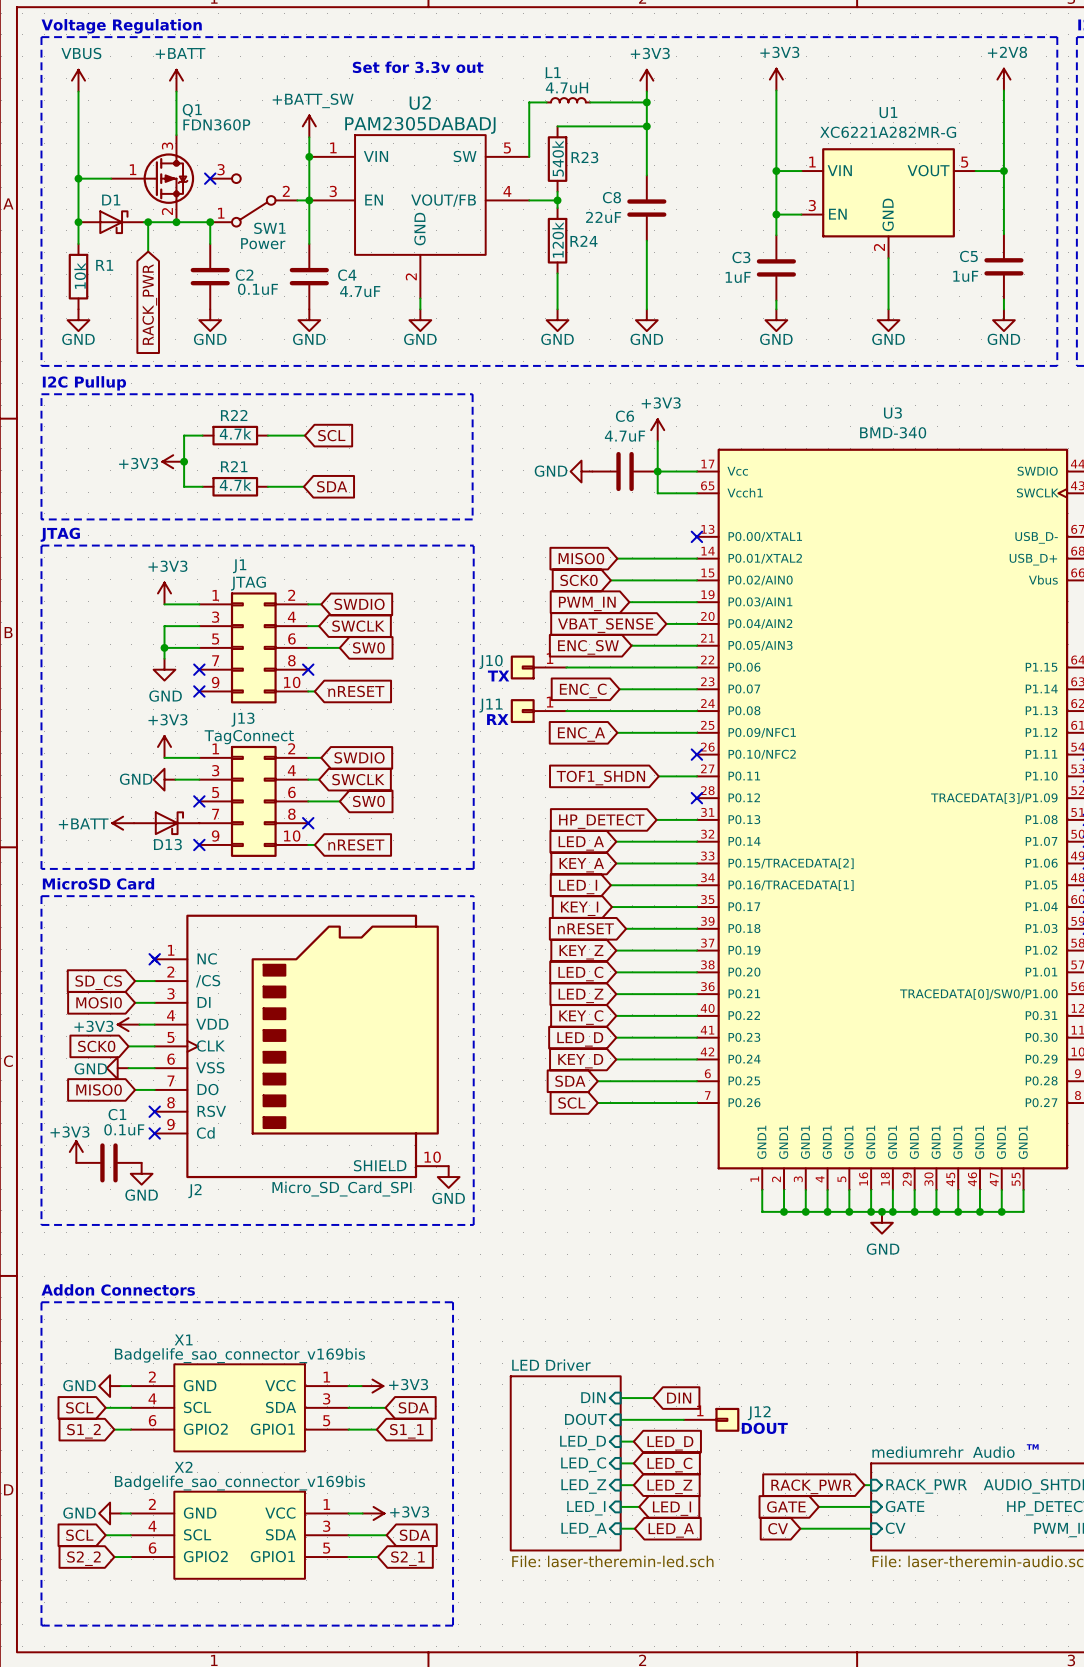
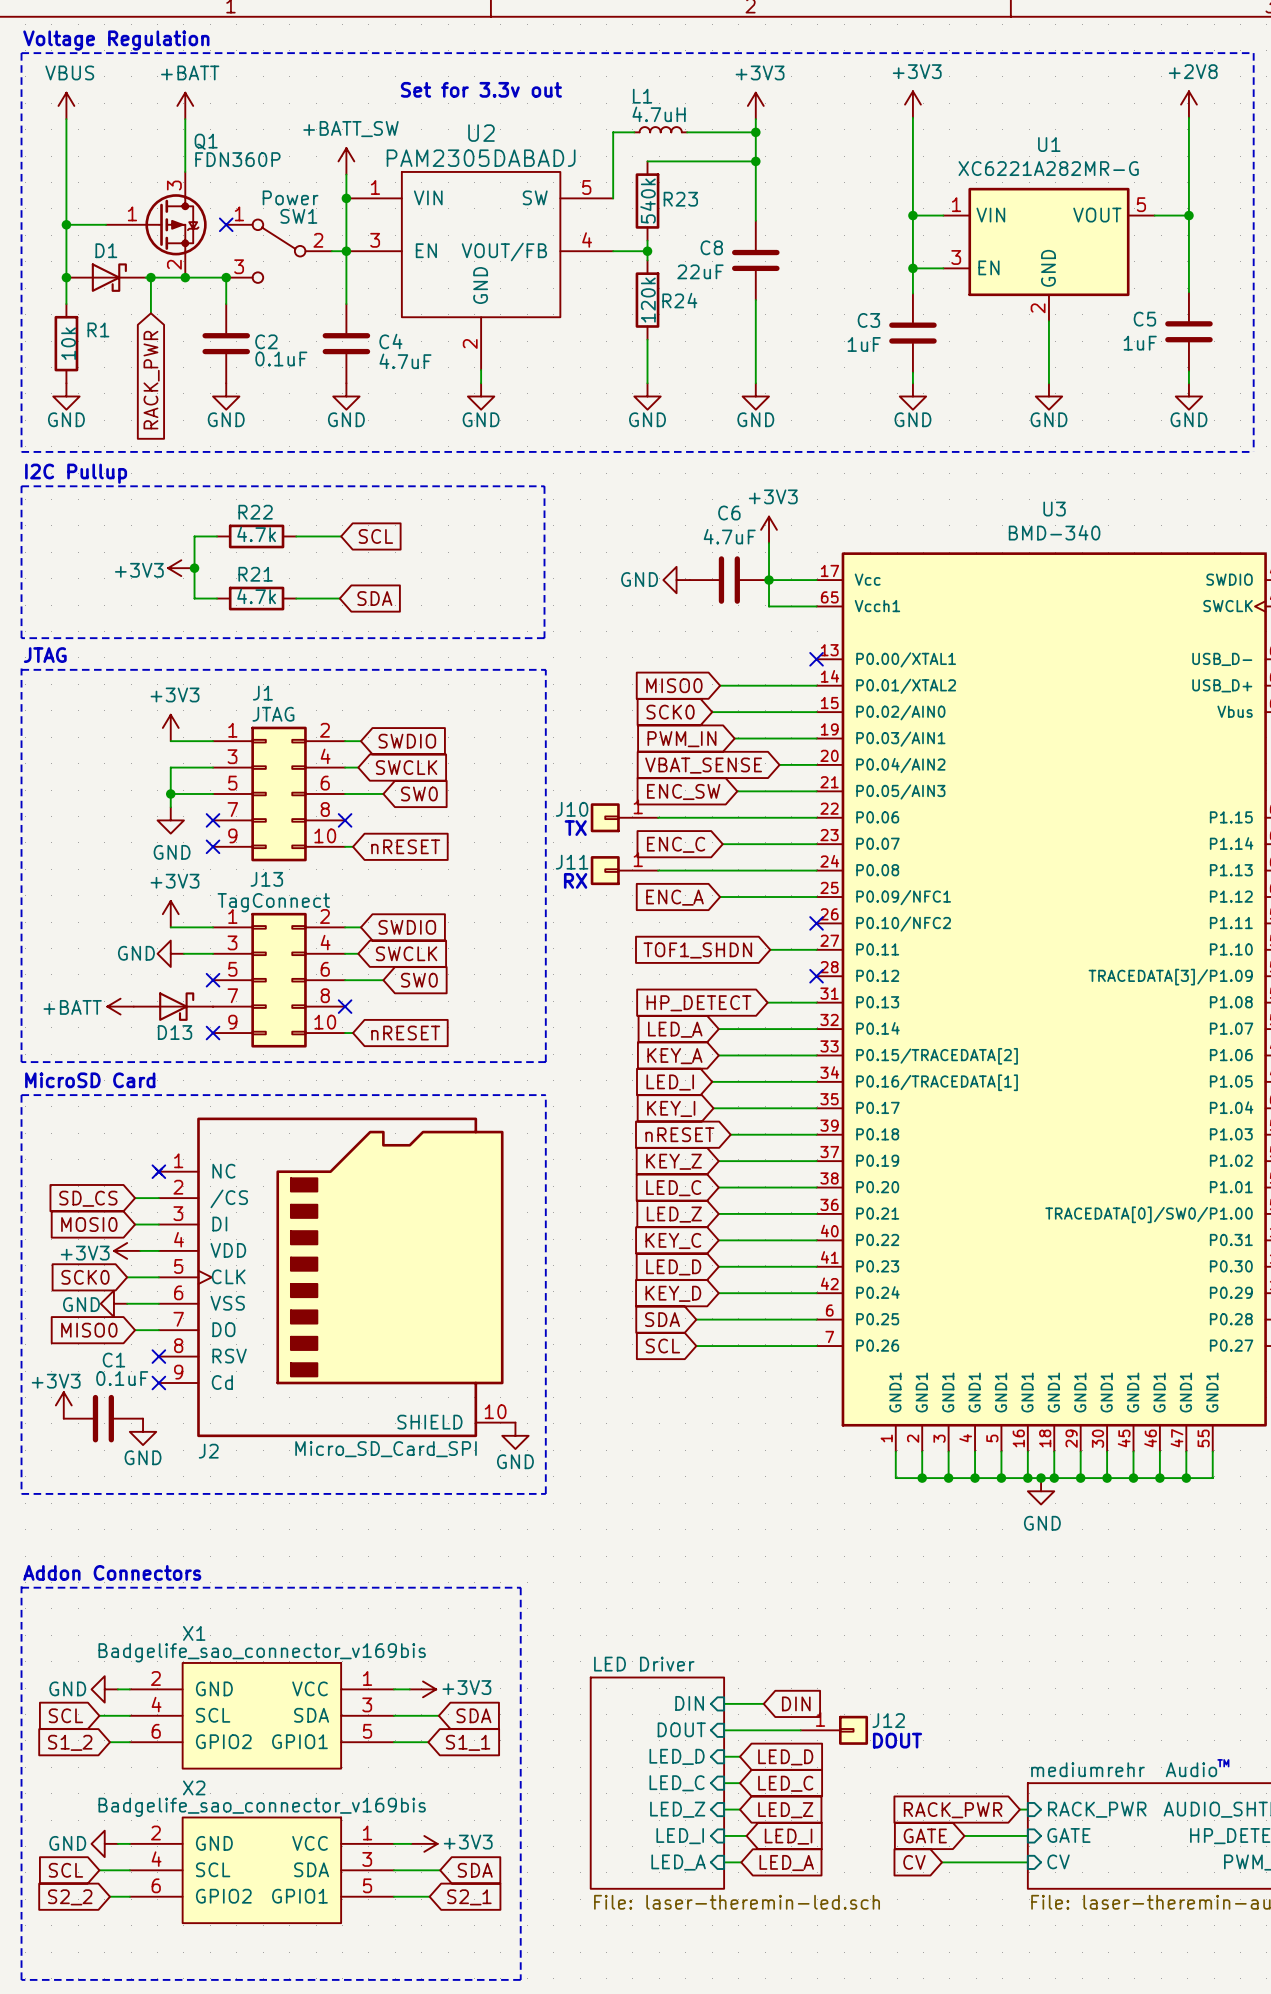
SW1 flip: as is (253, 200) -> up-down (279, 251)

